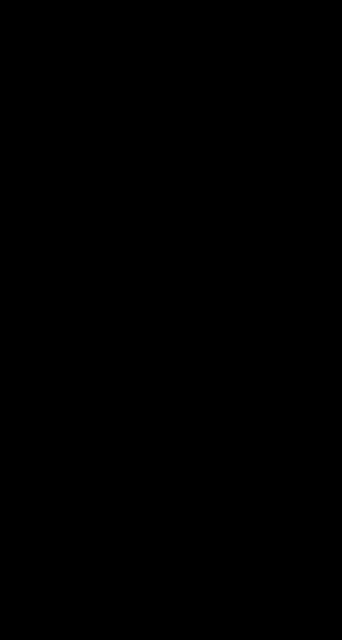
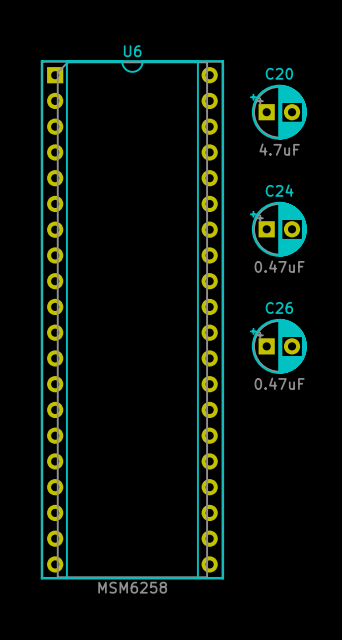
C20: none -> 4.7uF (278, 112)
C24: none -> 0.47uF (278, 229)
U6: none -> MSM6258 (132, 319)
C26: none -> 0.47uF (278, 346)

